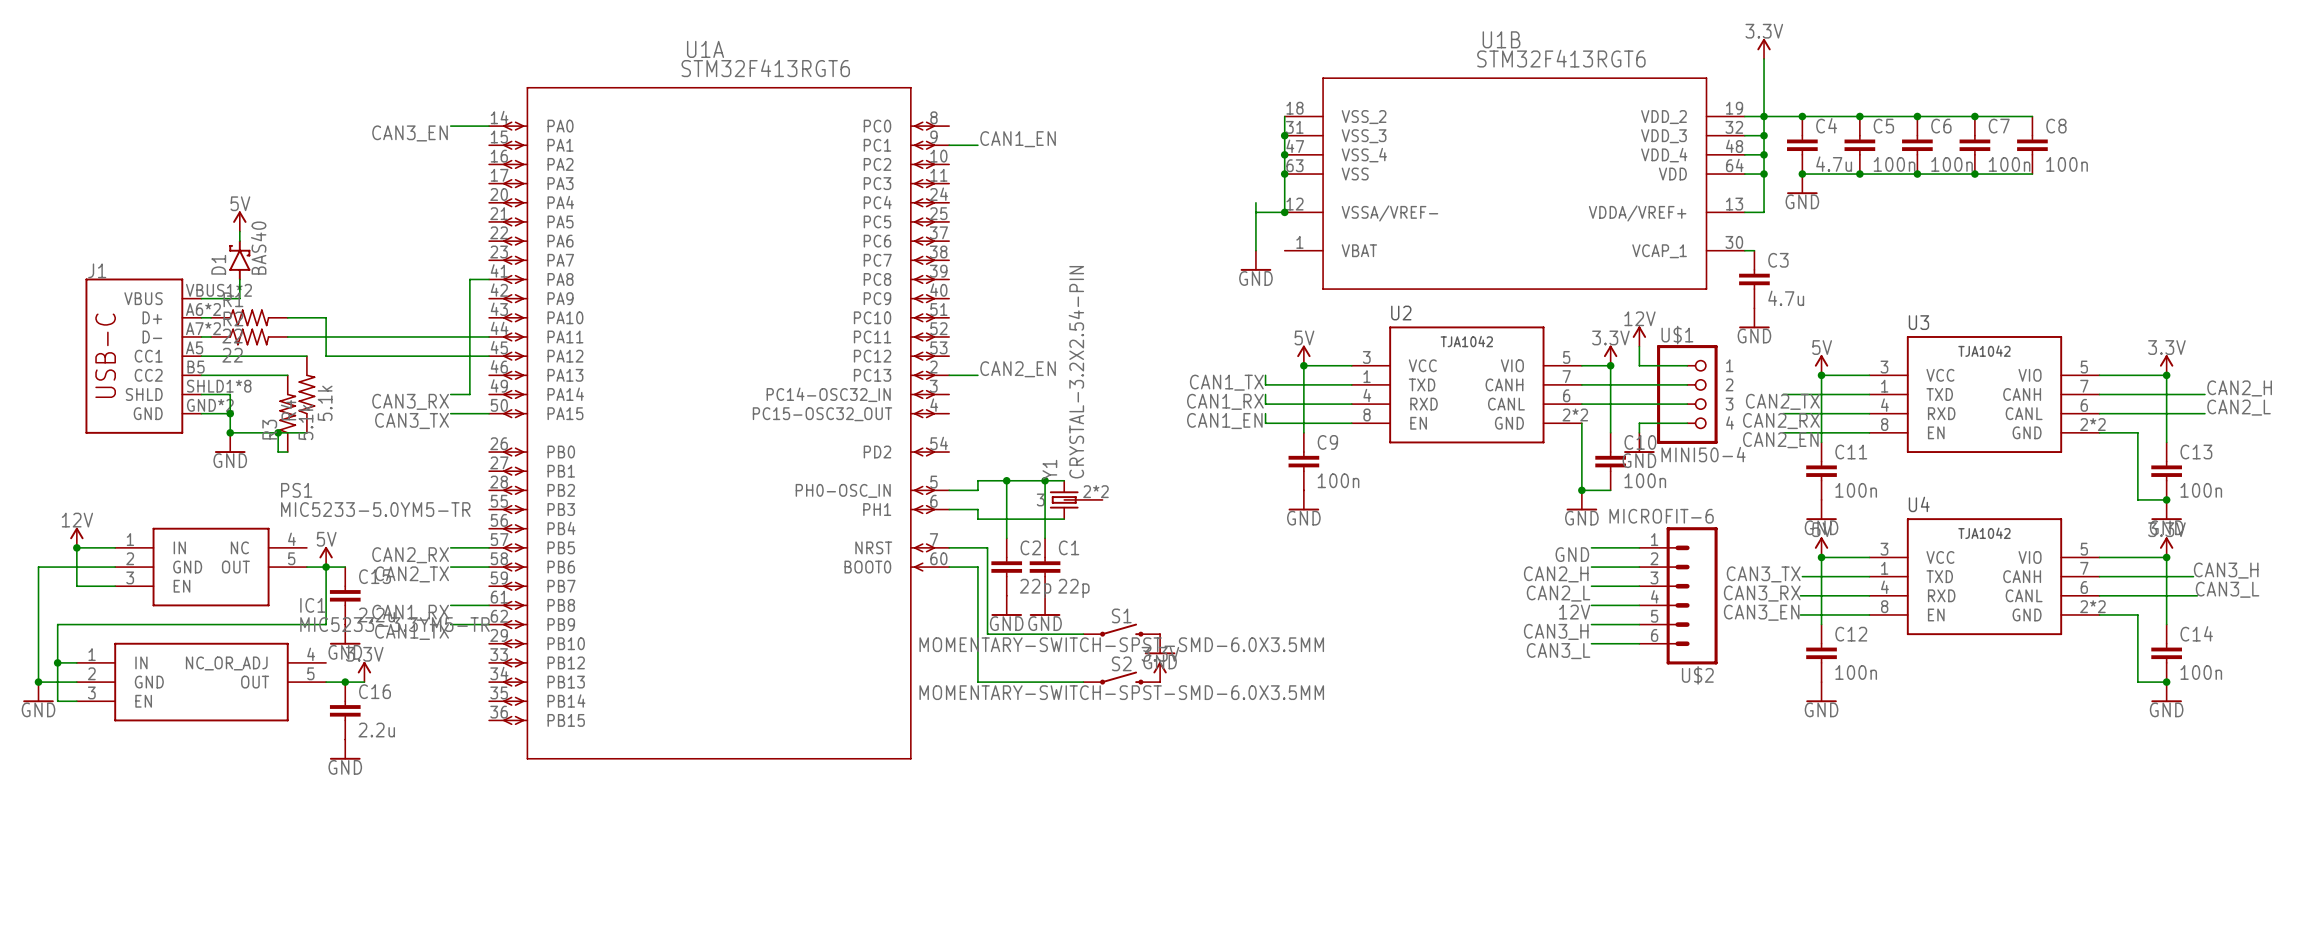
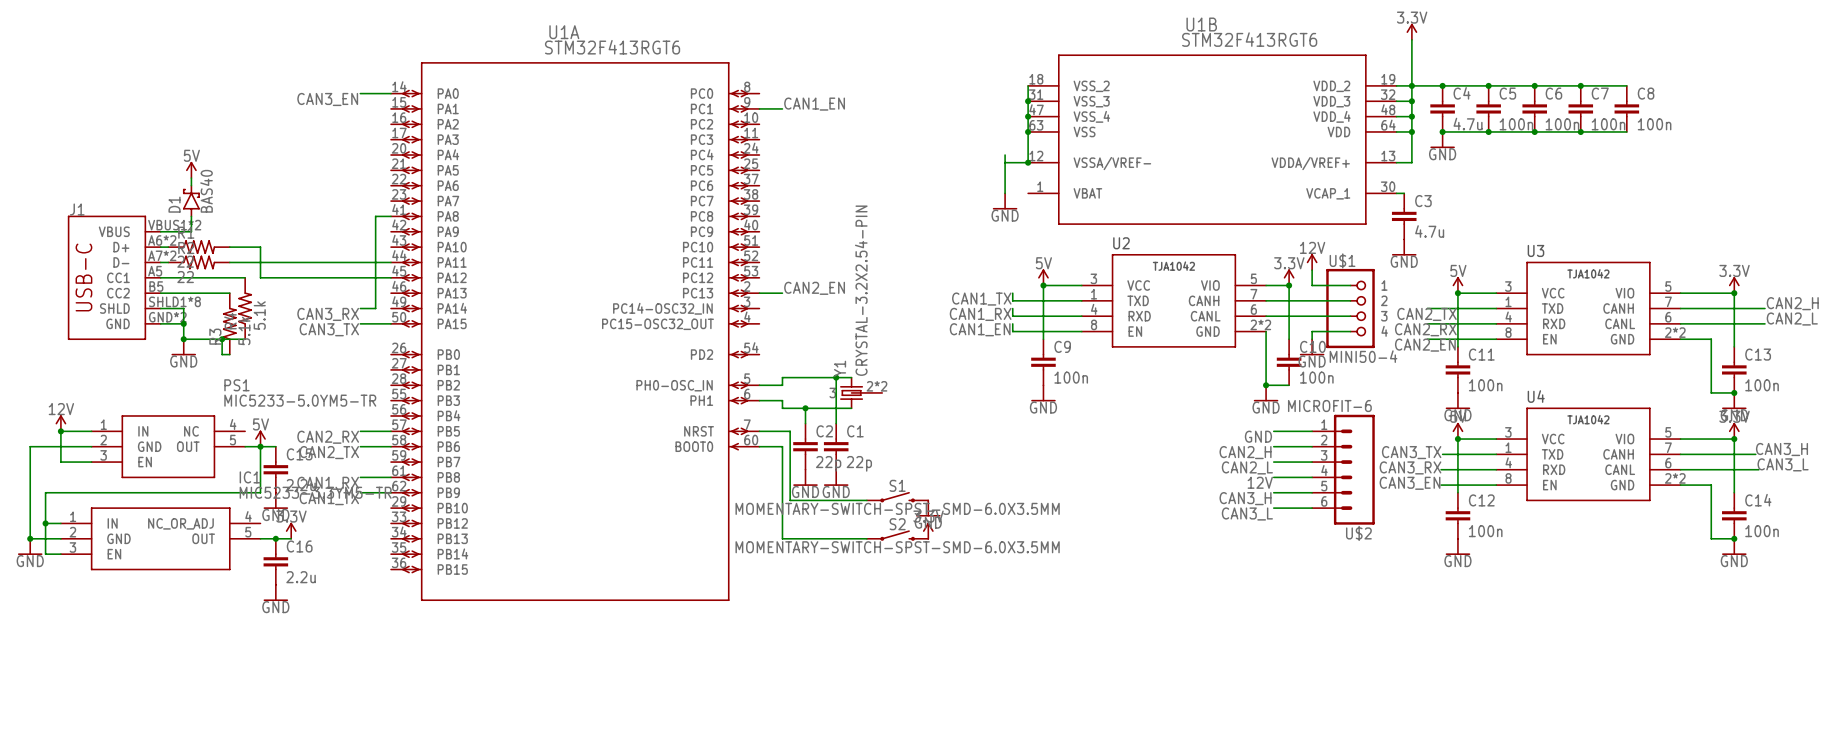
wire: (1006, 480) (1006, 519) -> none
junction position: (1006, 480) -> (805, 408)

